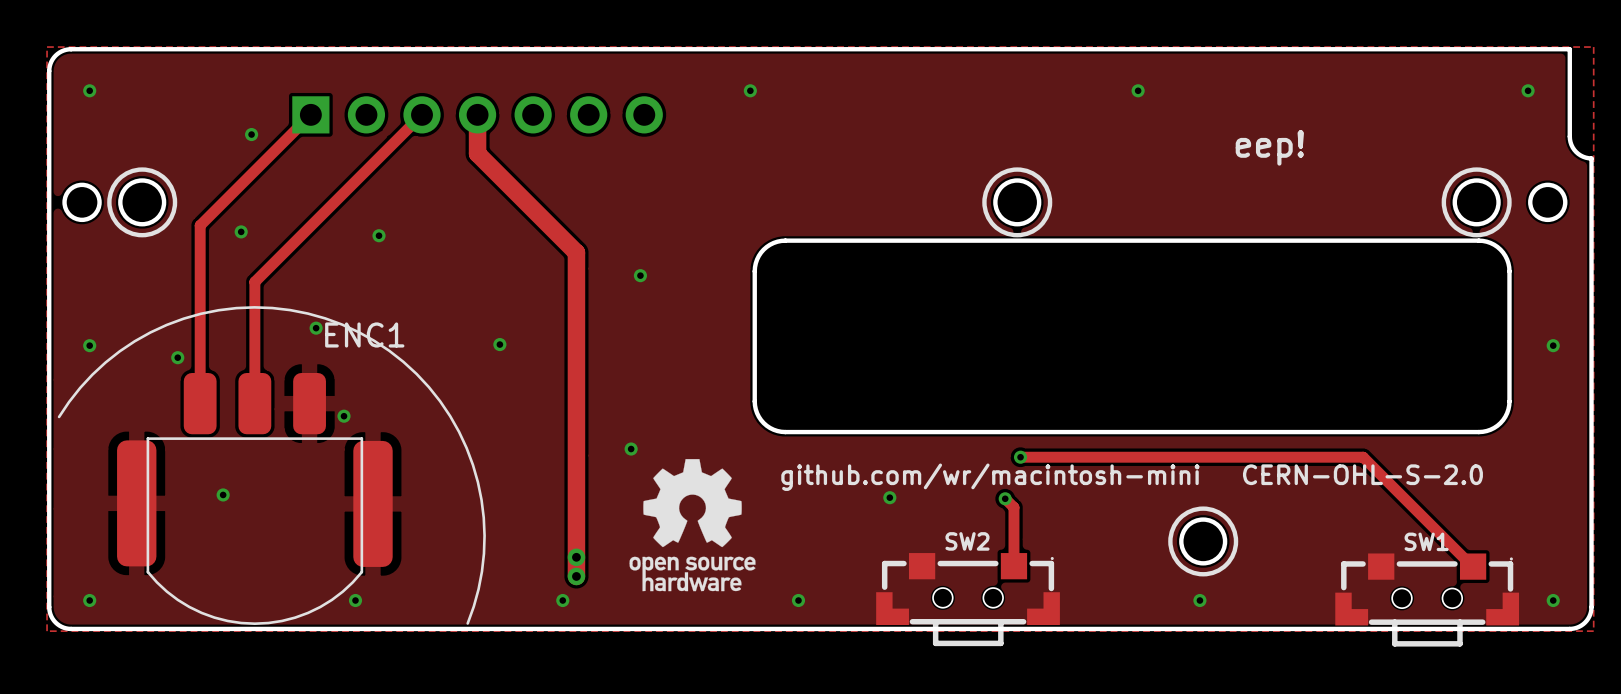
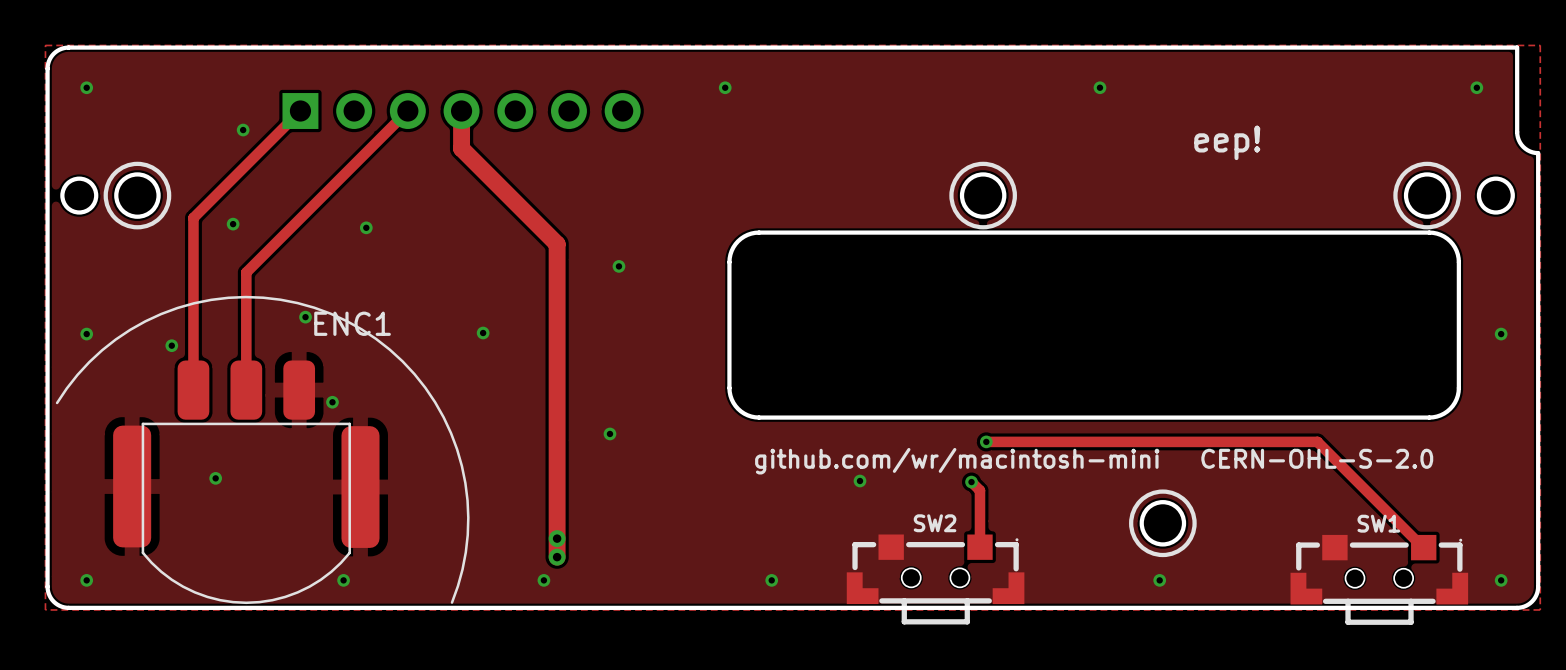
drawing: [629, 459, 756, 592] -> none

